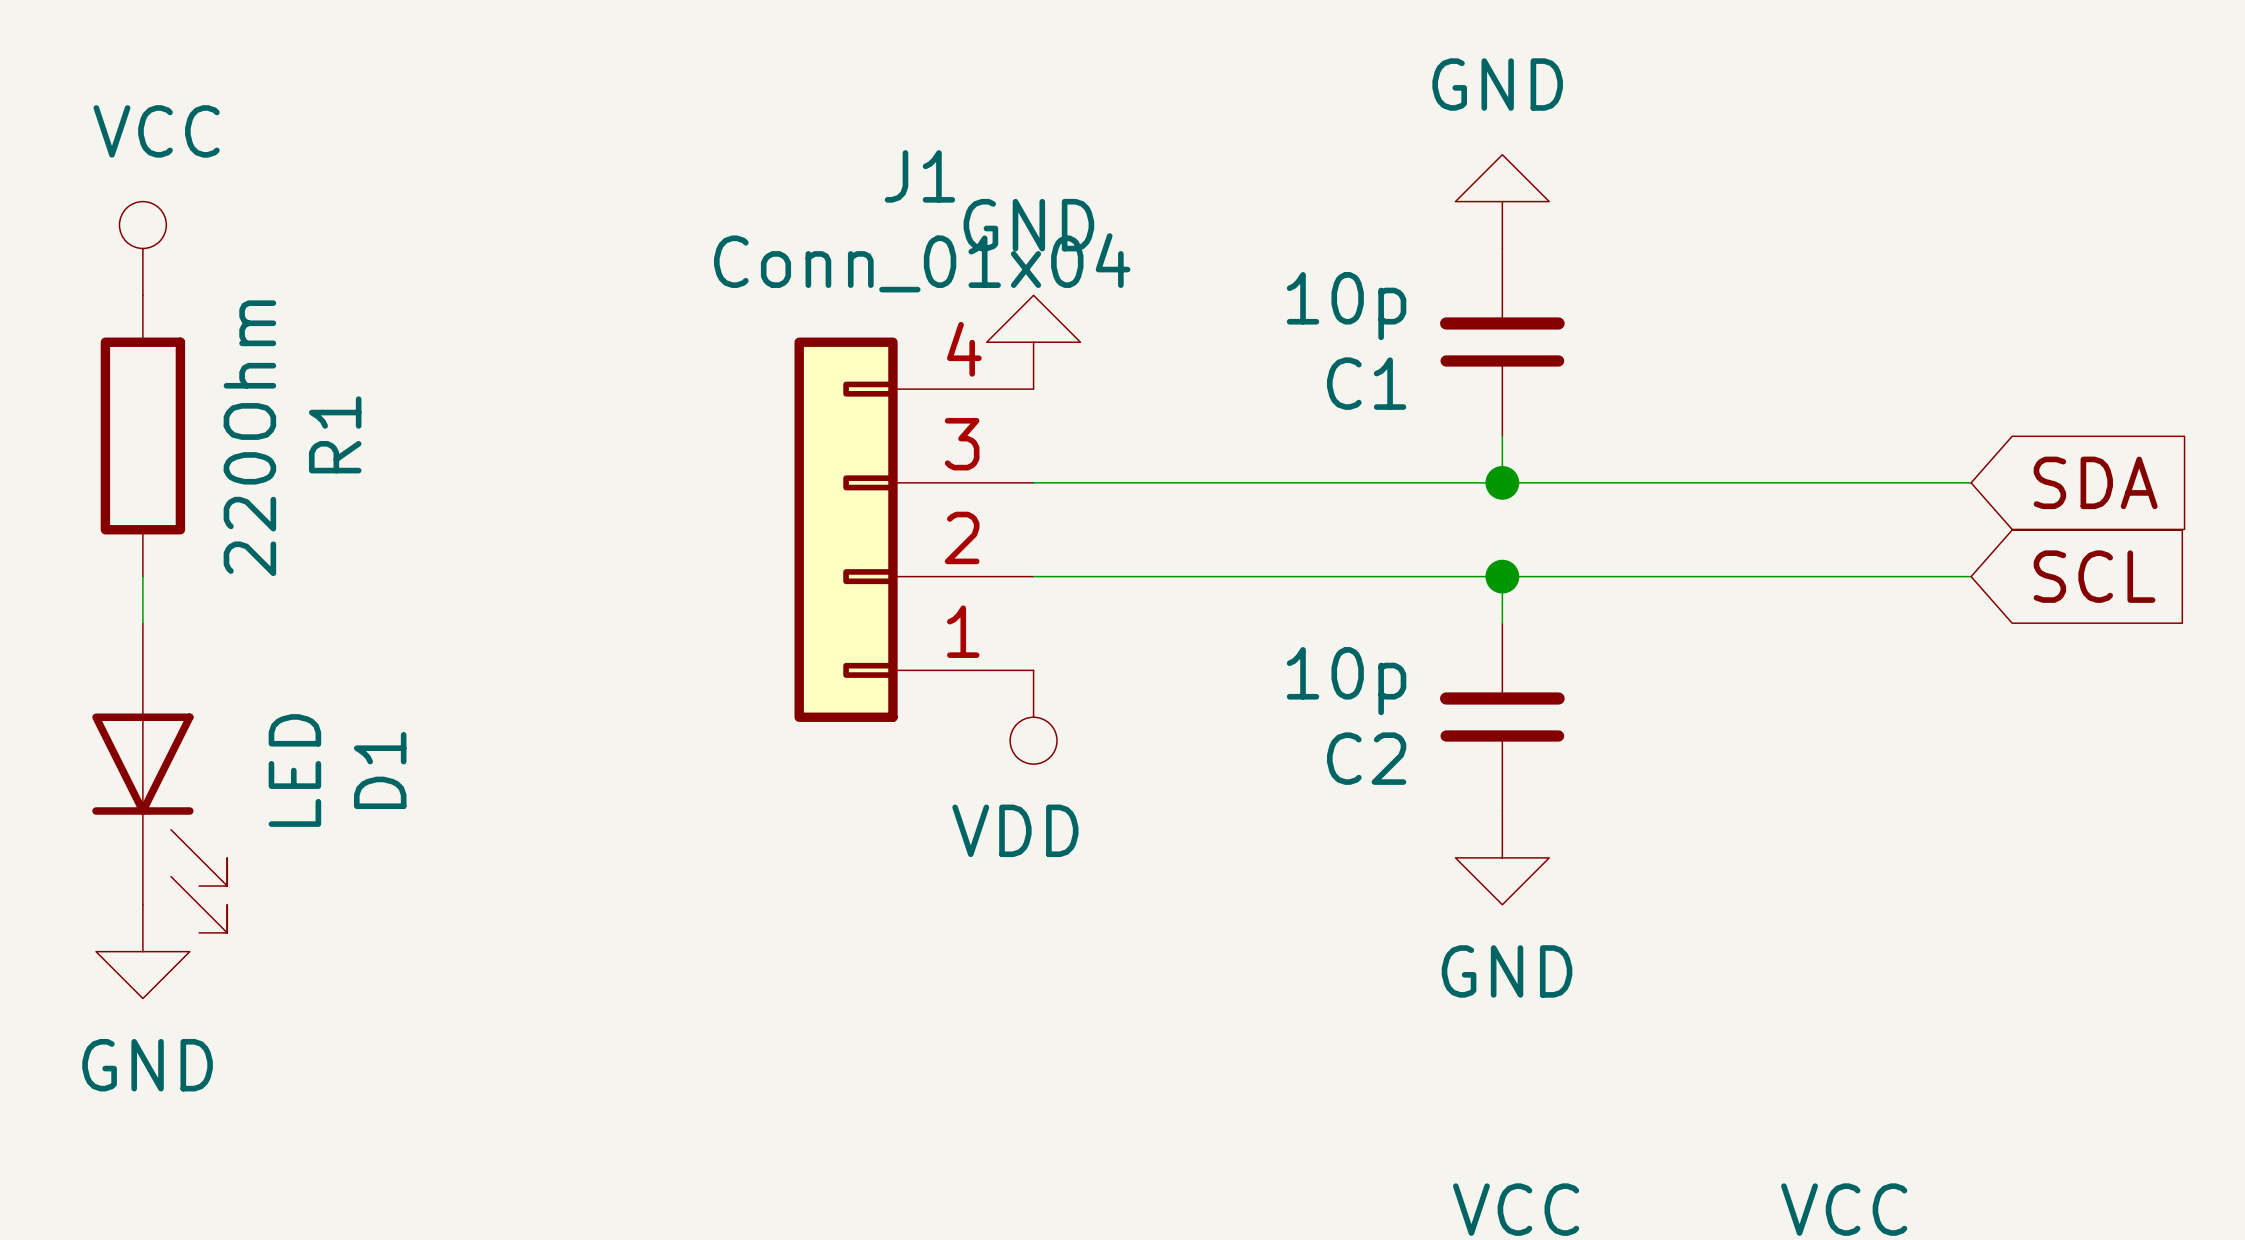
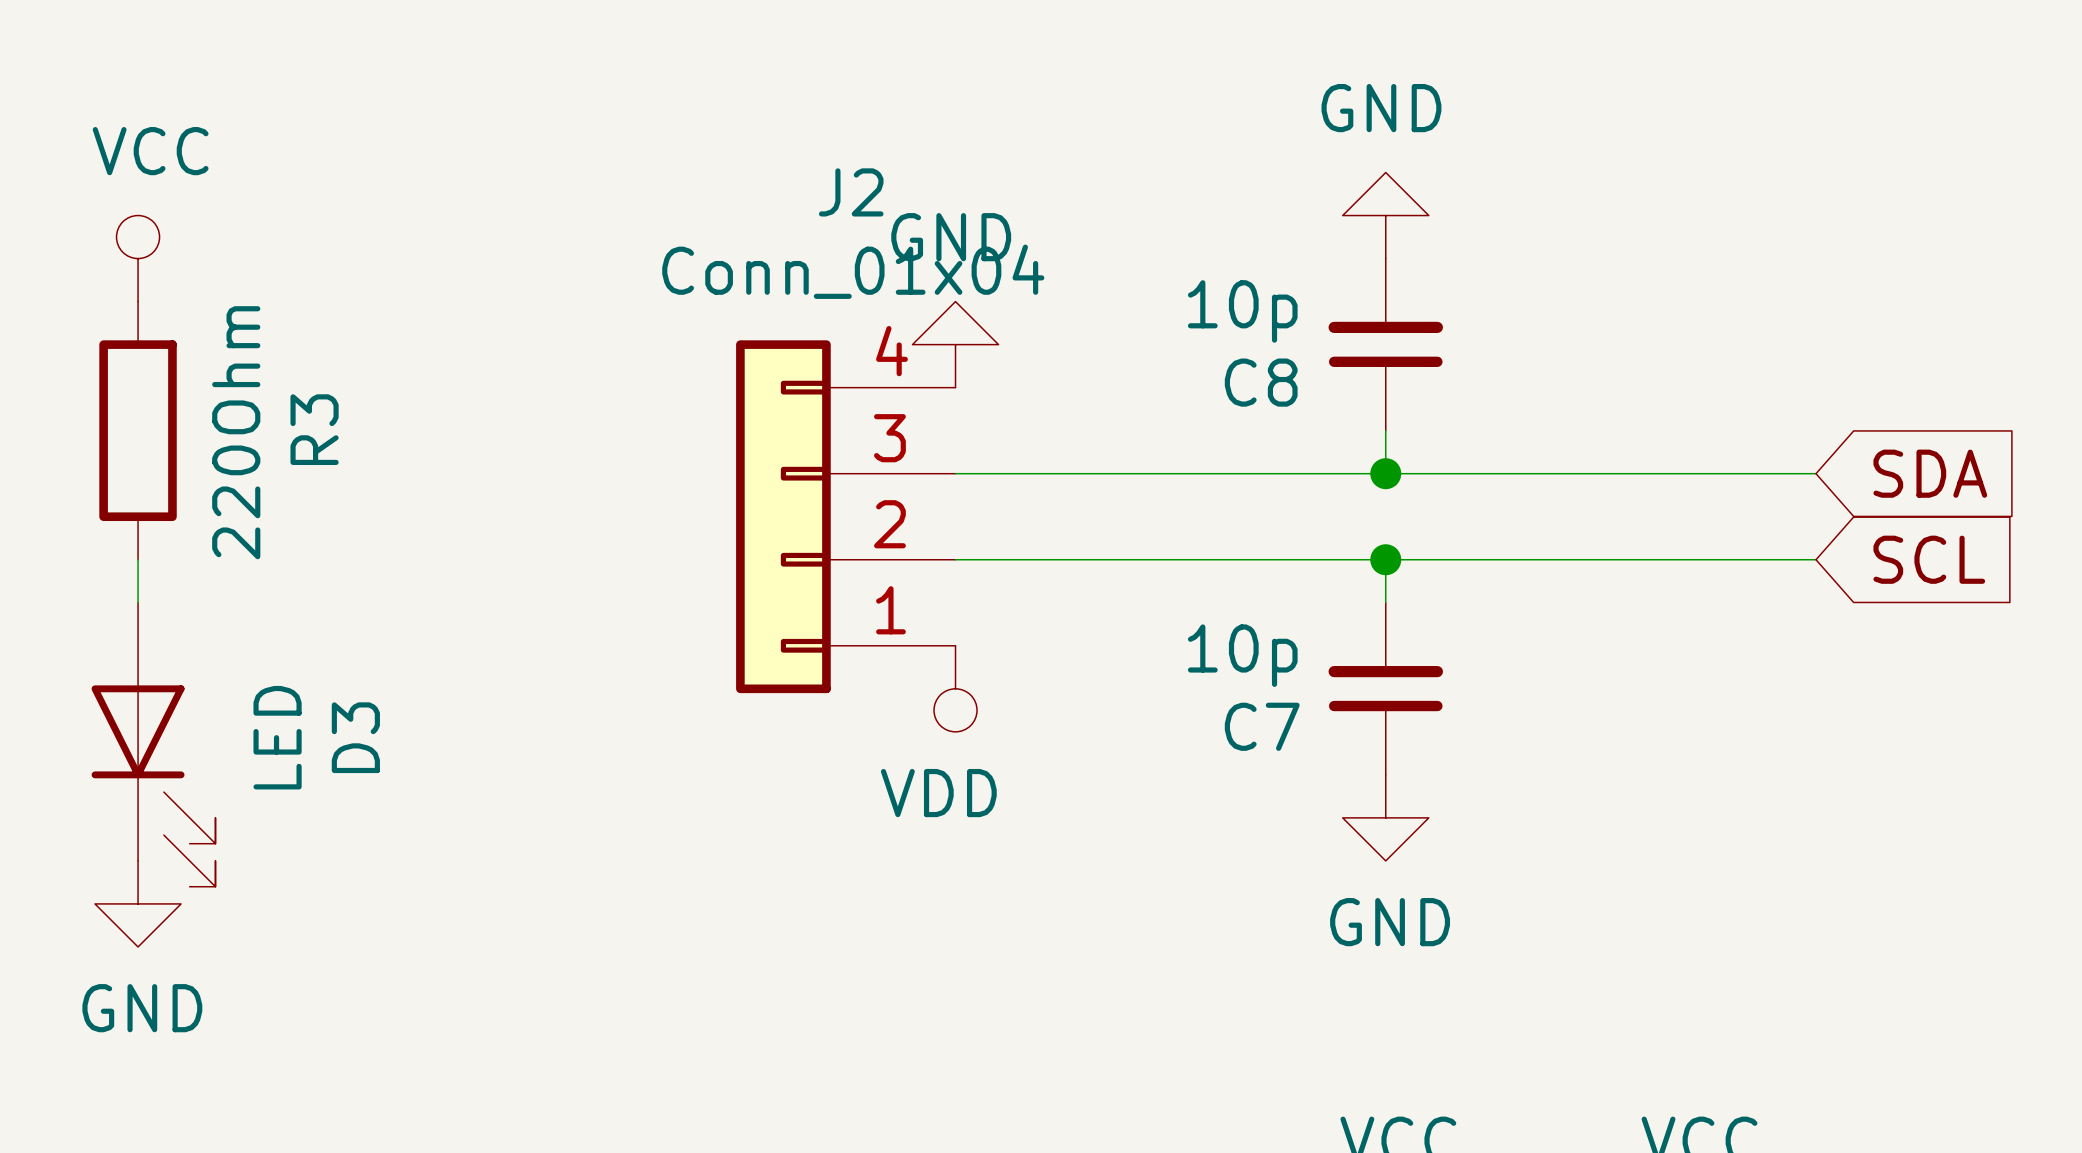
J1 name: J1 (919, 176) -> J2 (851, 192)
C1 name: C1 (1366, 383) -> C8 (1261, 382)
R1 name: R1 (335, 434) -> R3 (314, 429)
C2 name: C2 (1366, 758) -> C7 (1262, 726)
D1 name: D1 (380, 770) -> D3 (355, 737)

